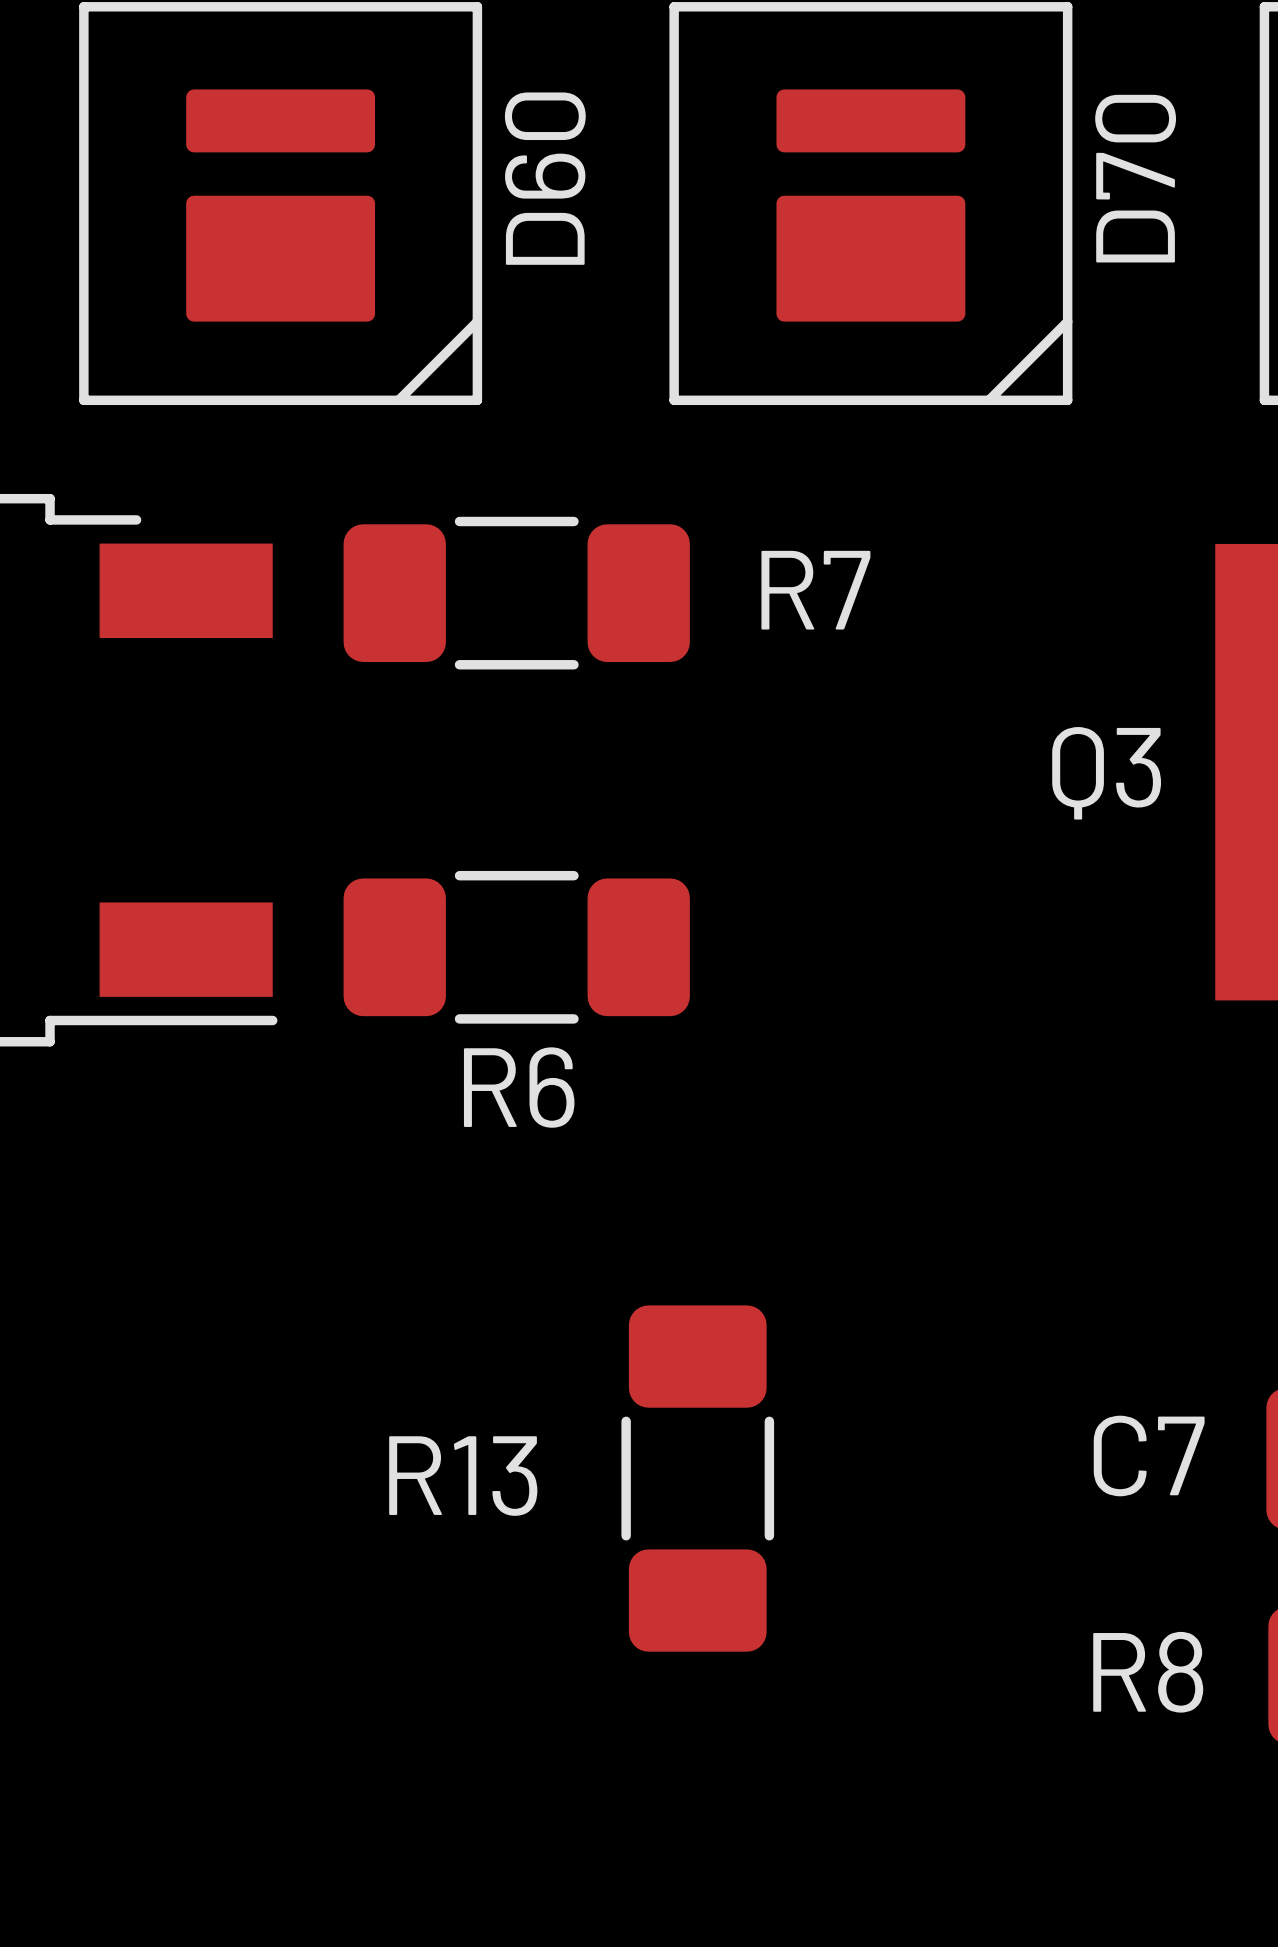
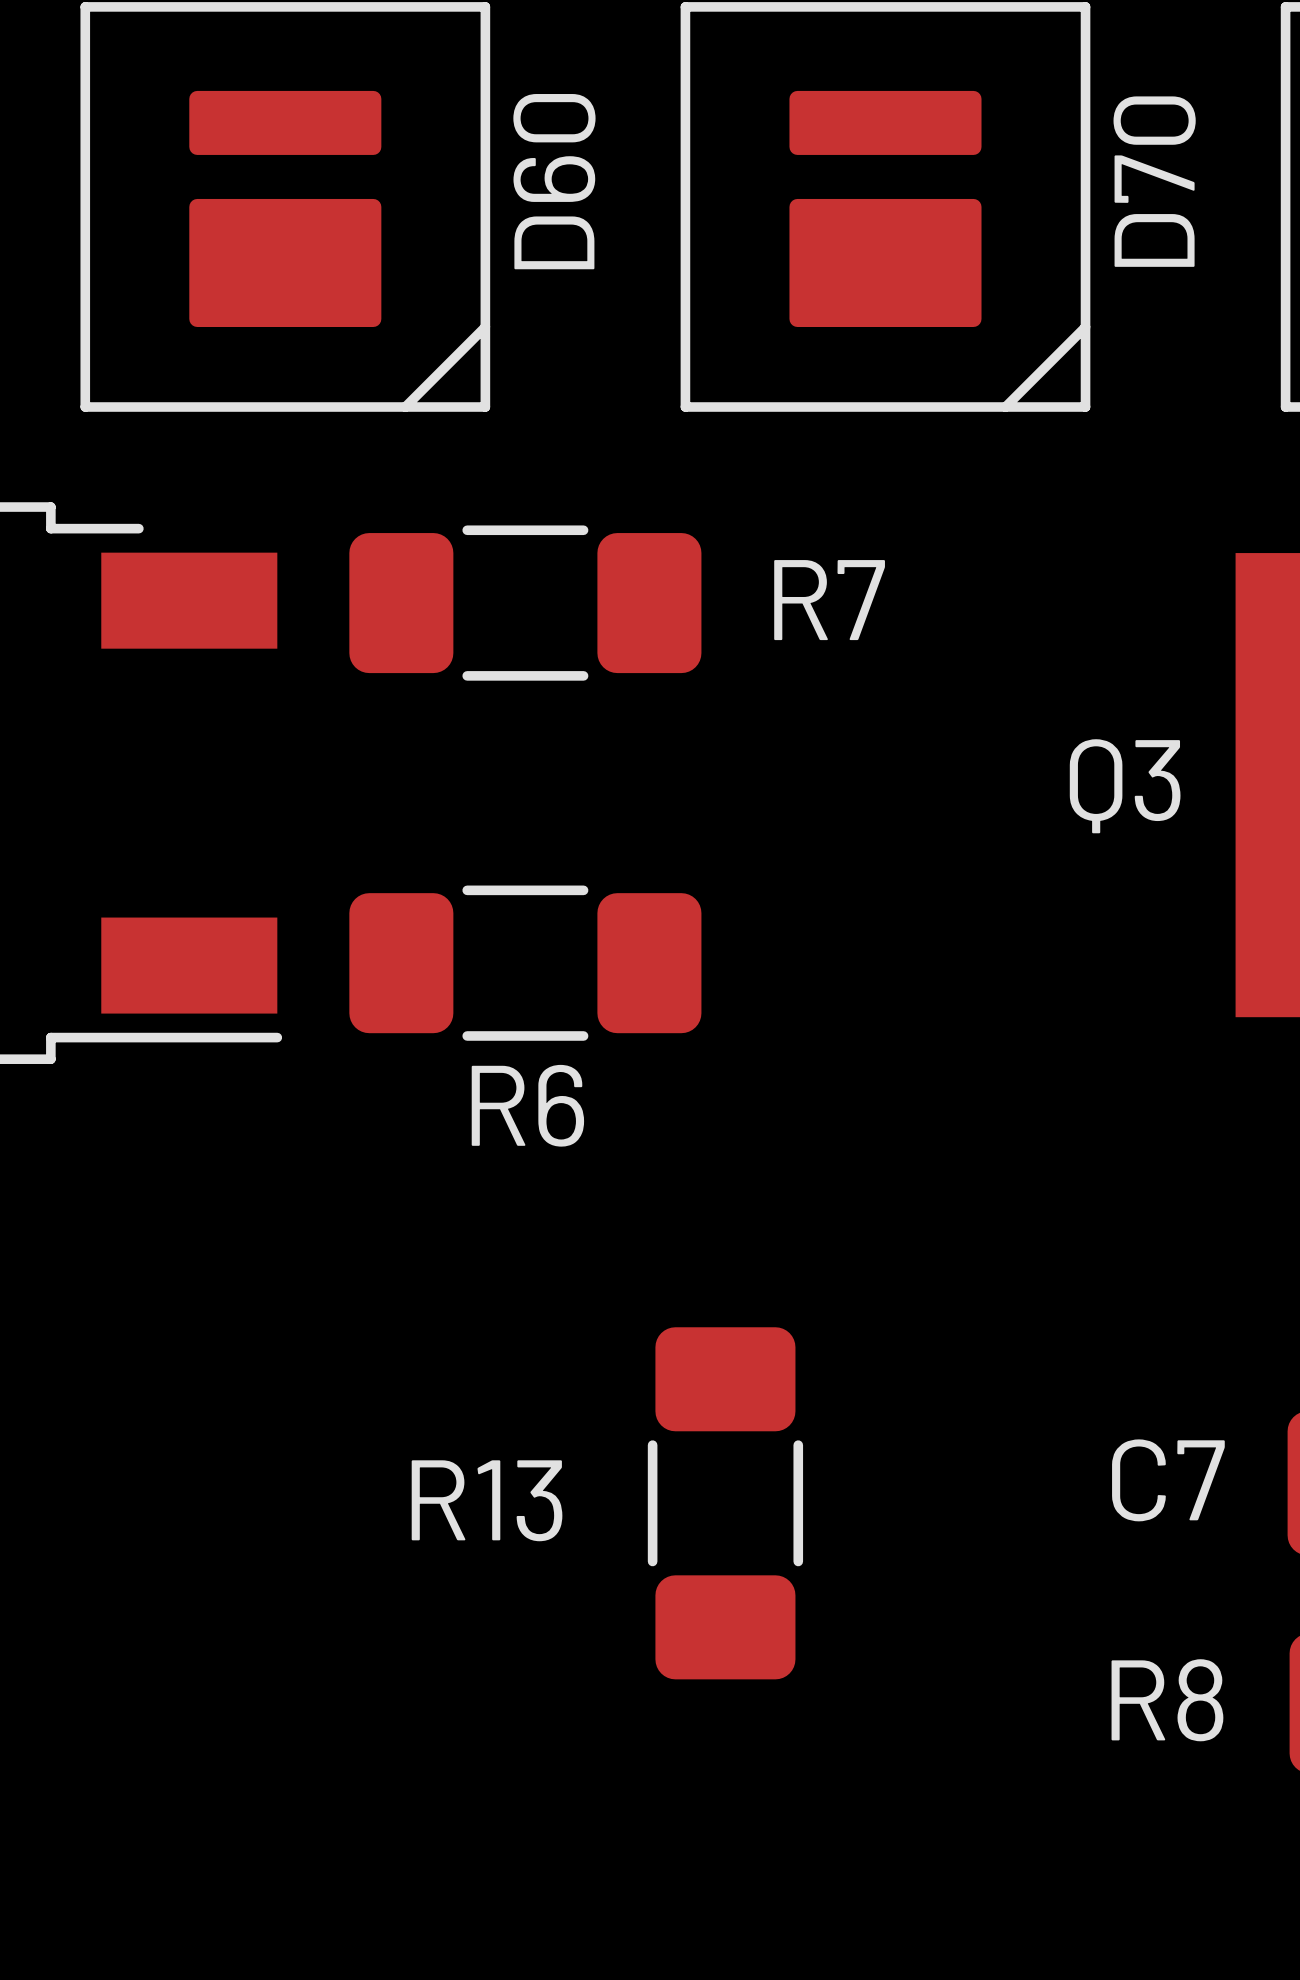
R13 position: (697, 1478) -> (725, 1503)

